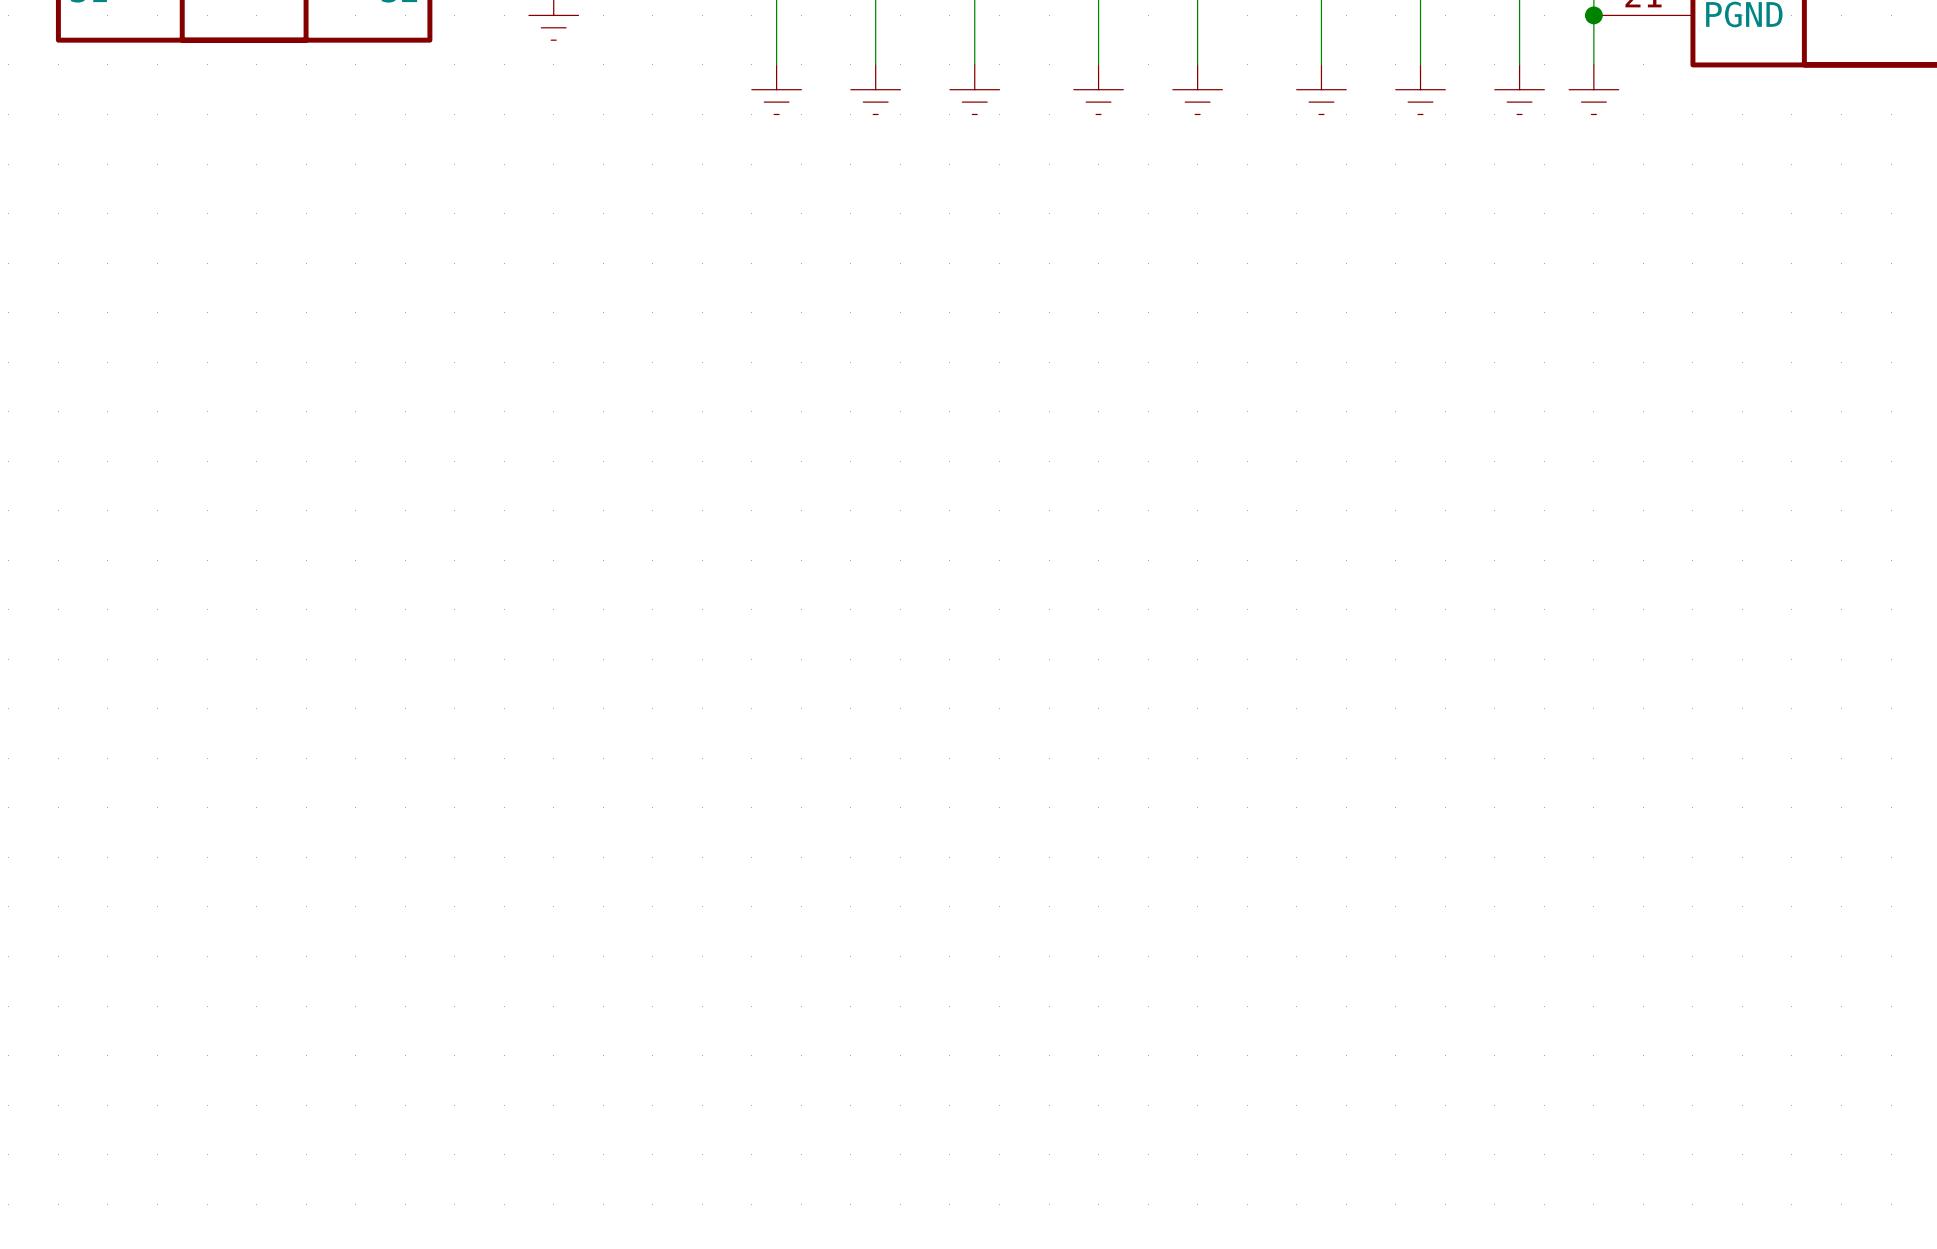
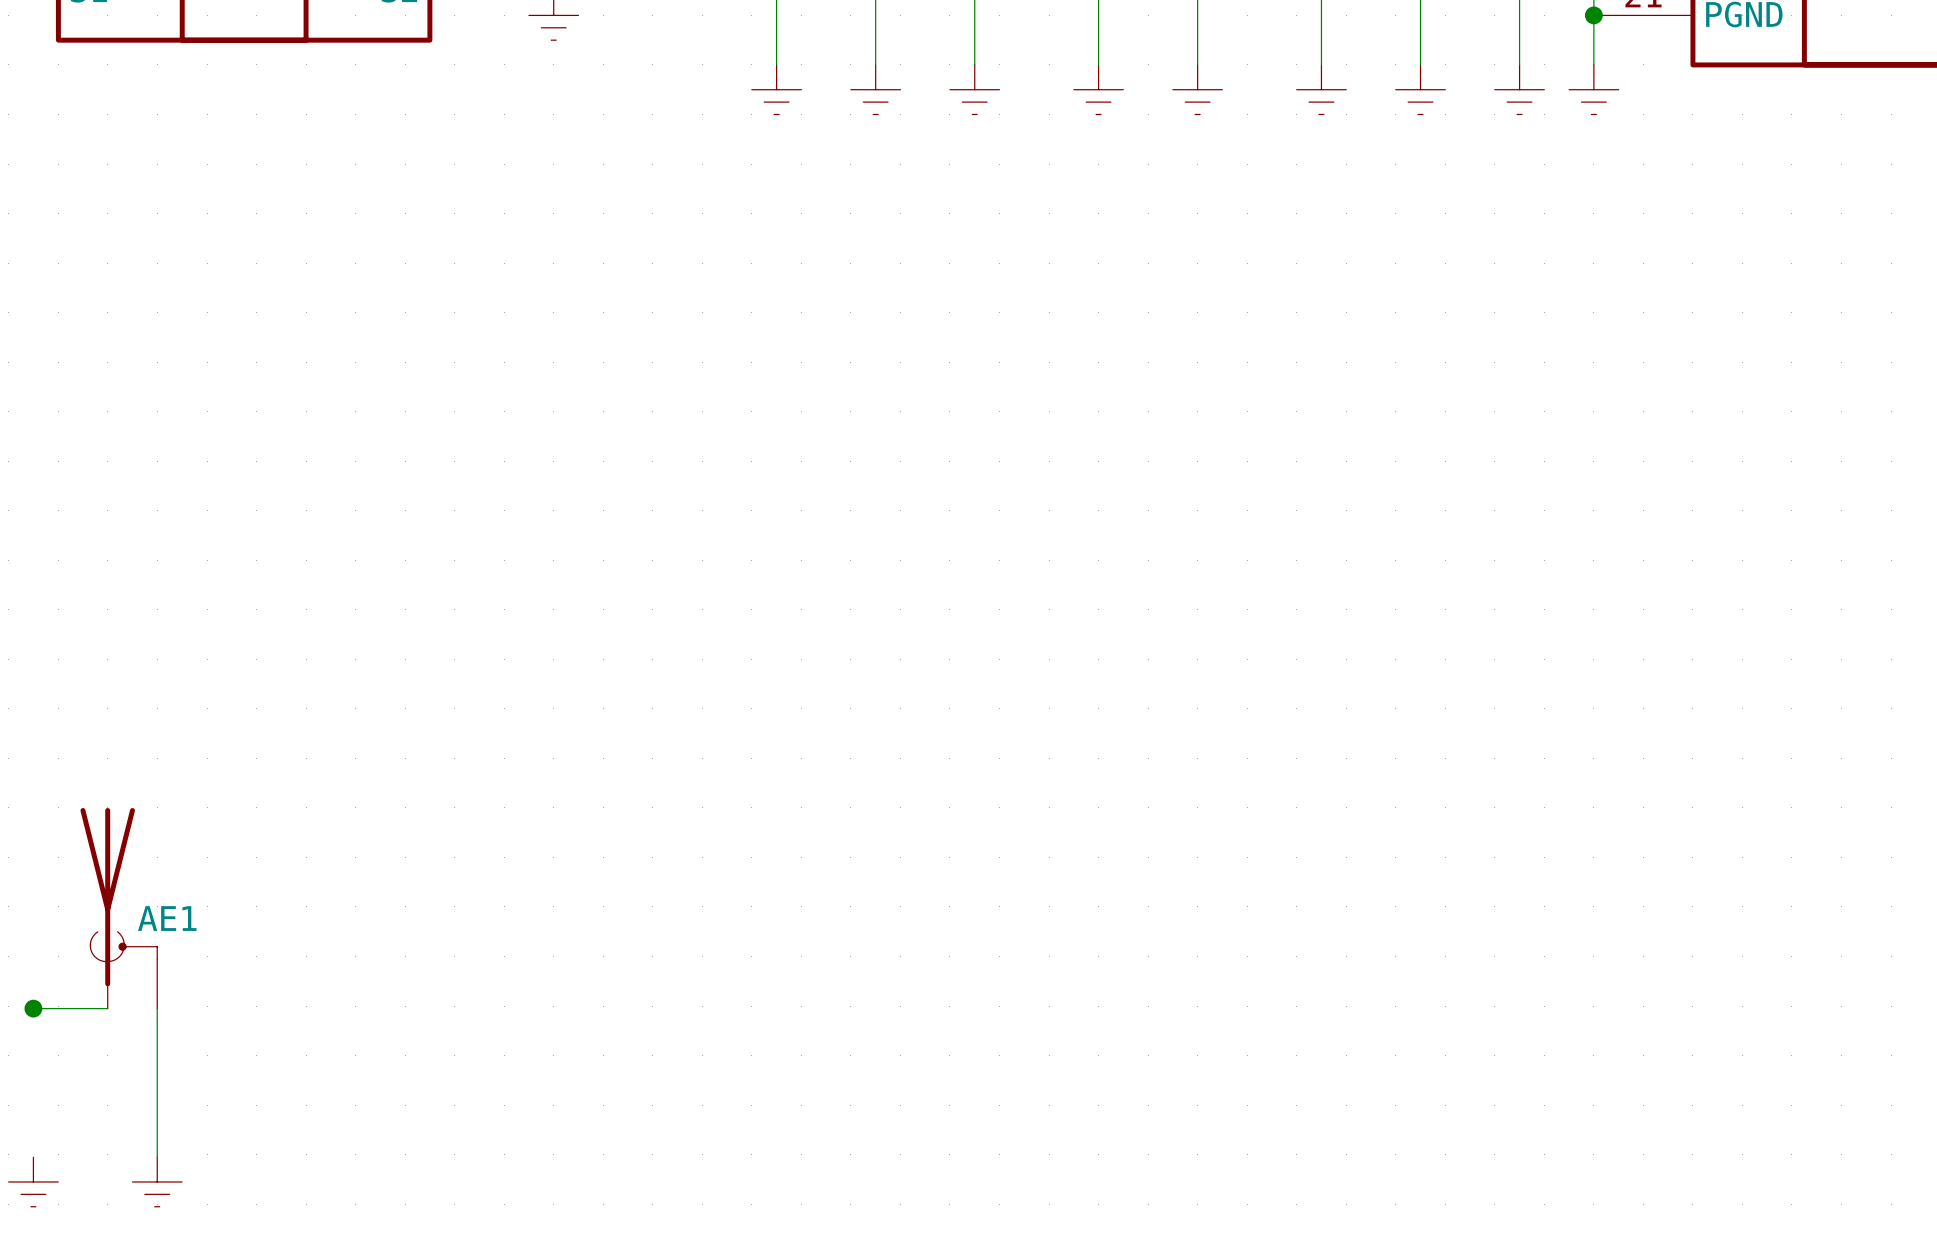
AE1: none -> (118, 908)
wire: none -> (33, 1008) (107, 1008)
junction: none -> (33, 1008)
wire: none -> (157, 1008) (157, 1157)
power symbol: none -> (33, 1181)
power symbol: none -> (157, 1181)

